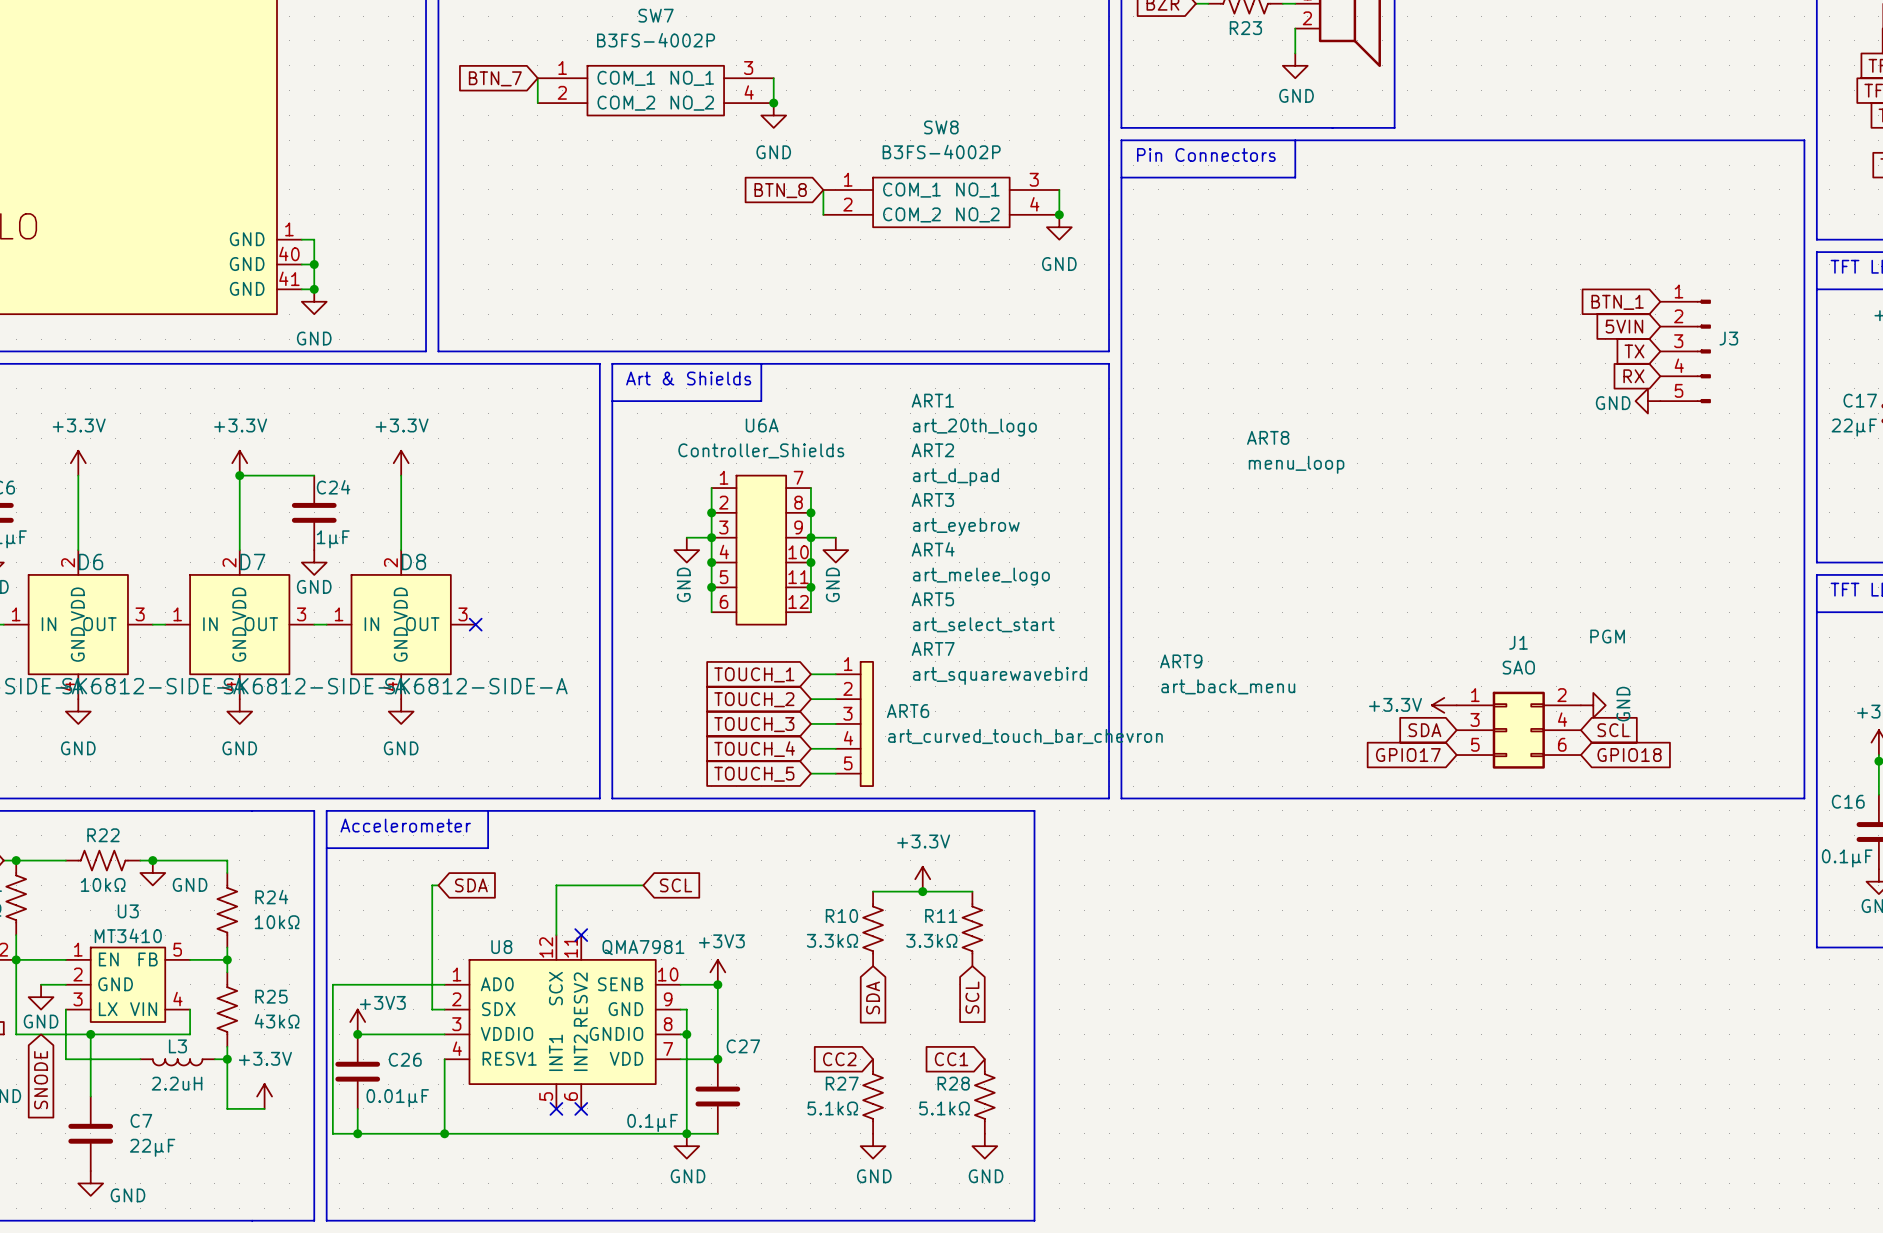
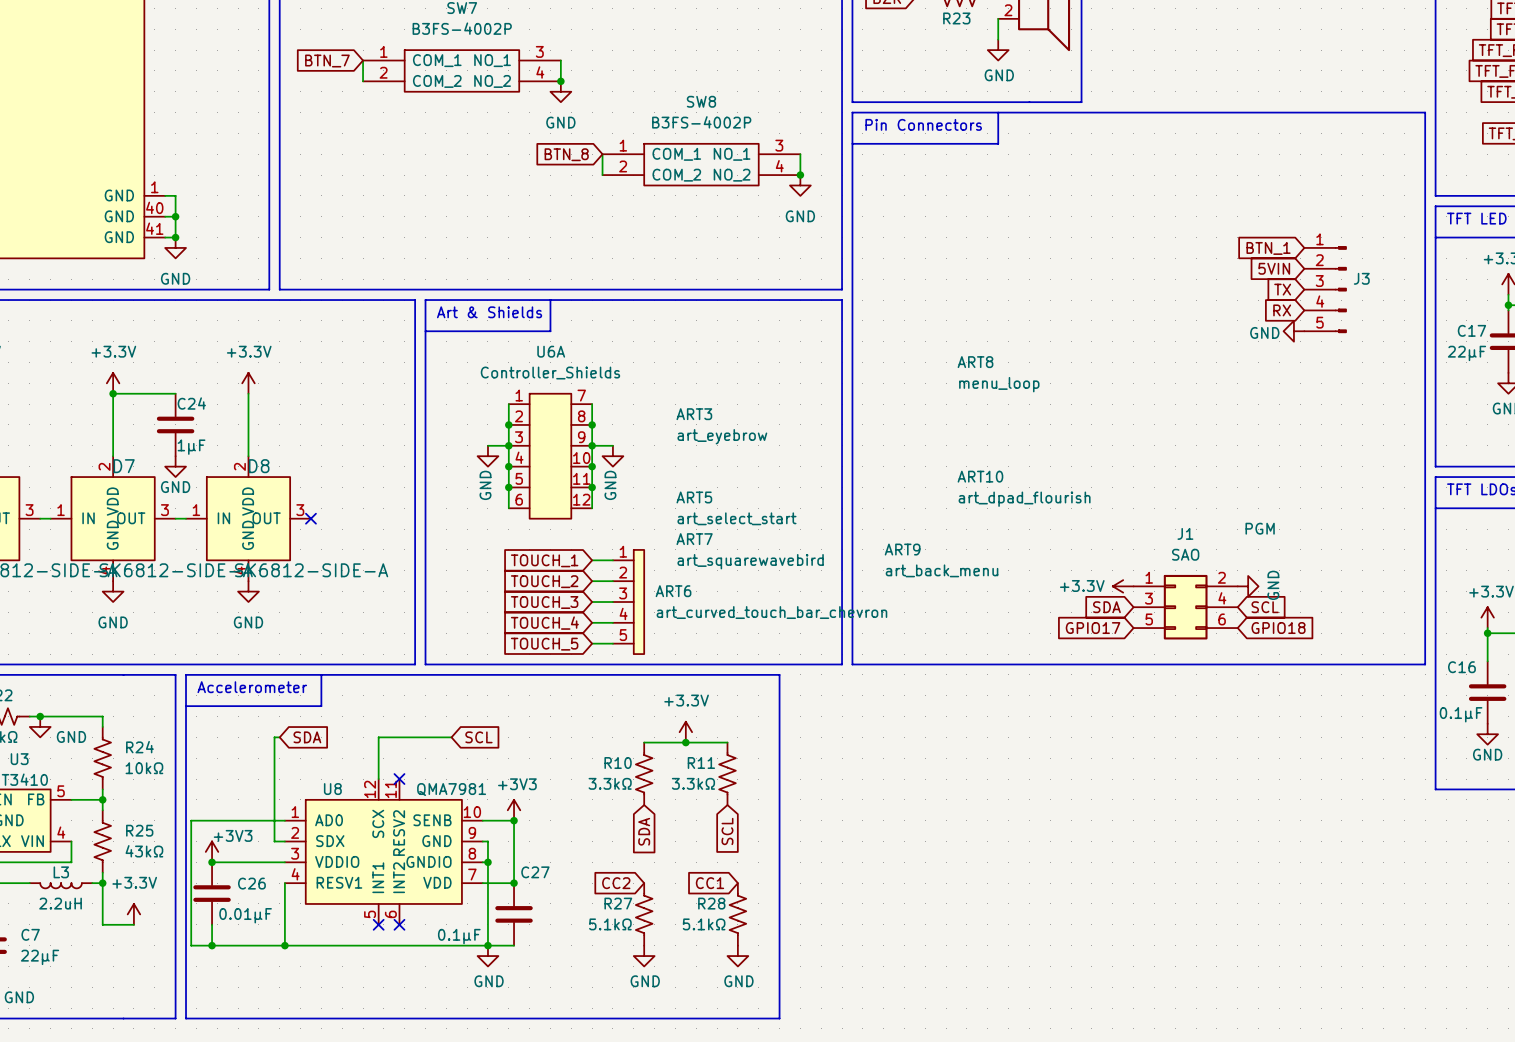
ART1: art_20th_logo (974, 415) -> none
ART2: art_d_pad (955, 464) -> none
ART4: art_melee_logo (980, 563) -> none
ART10: none -> art_dpad_flourish (1024, 488)

